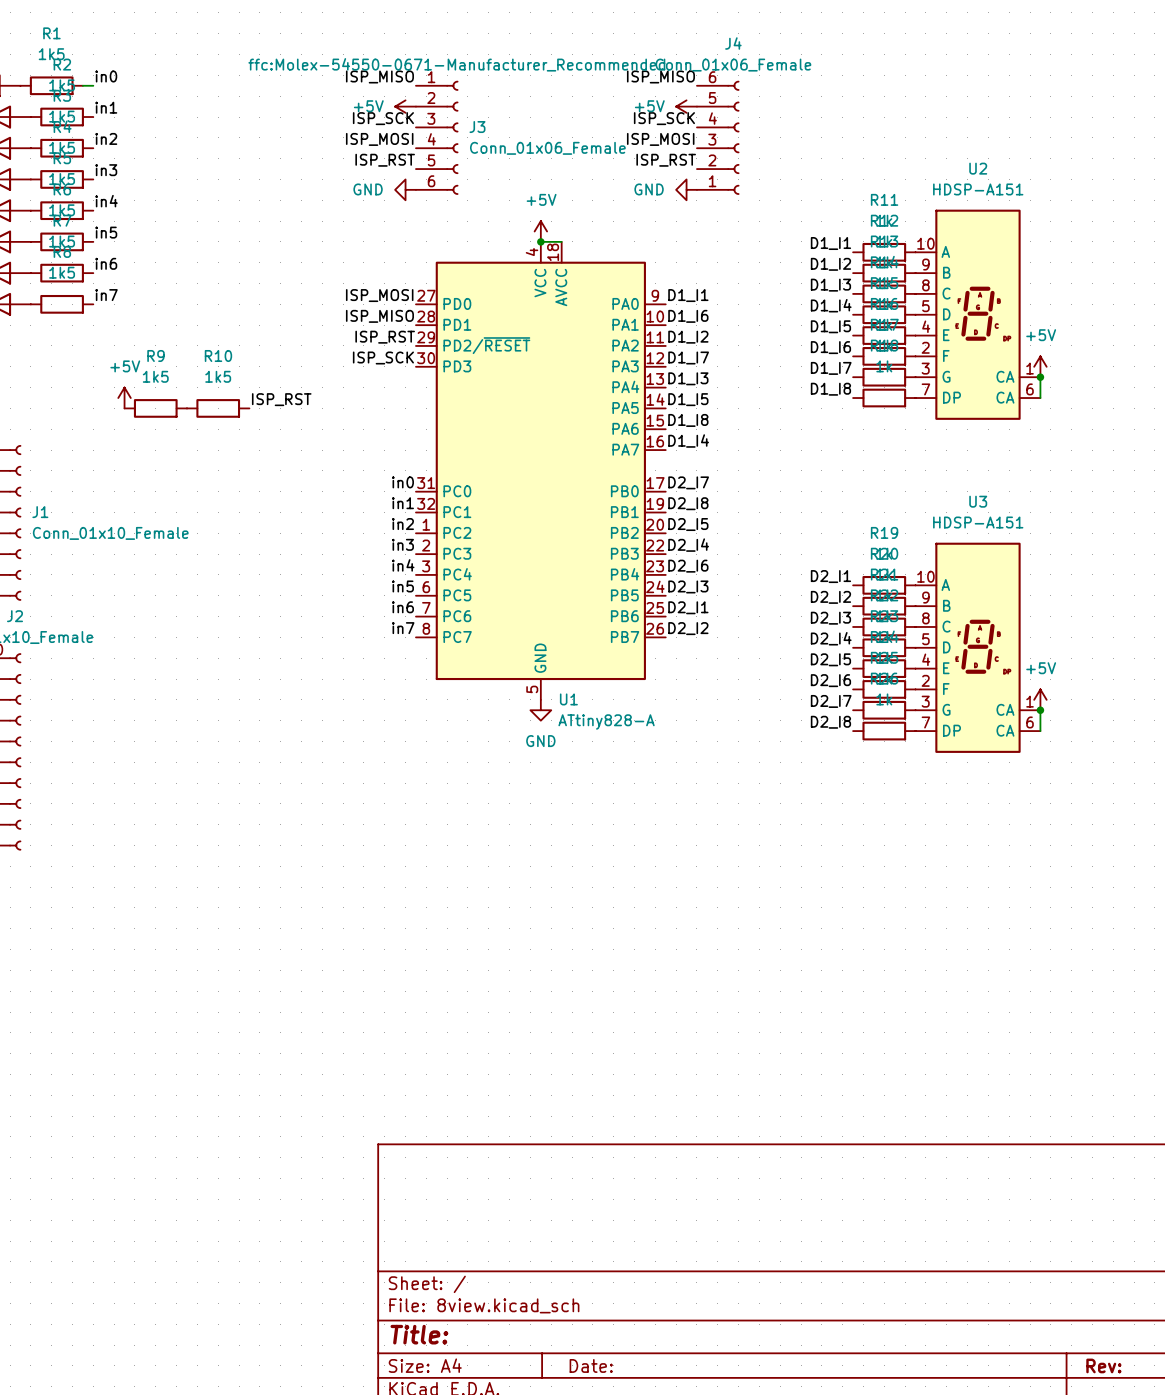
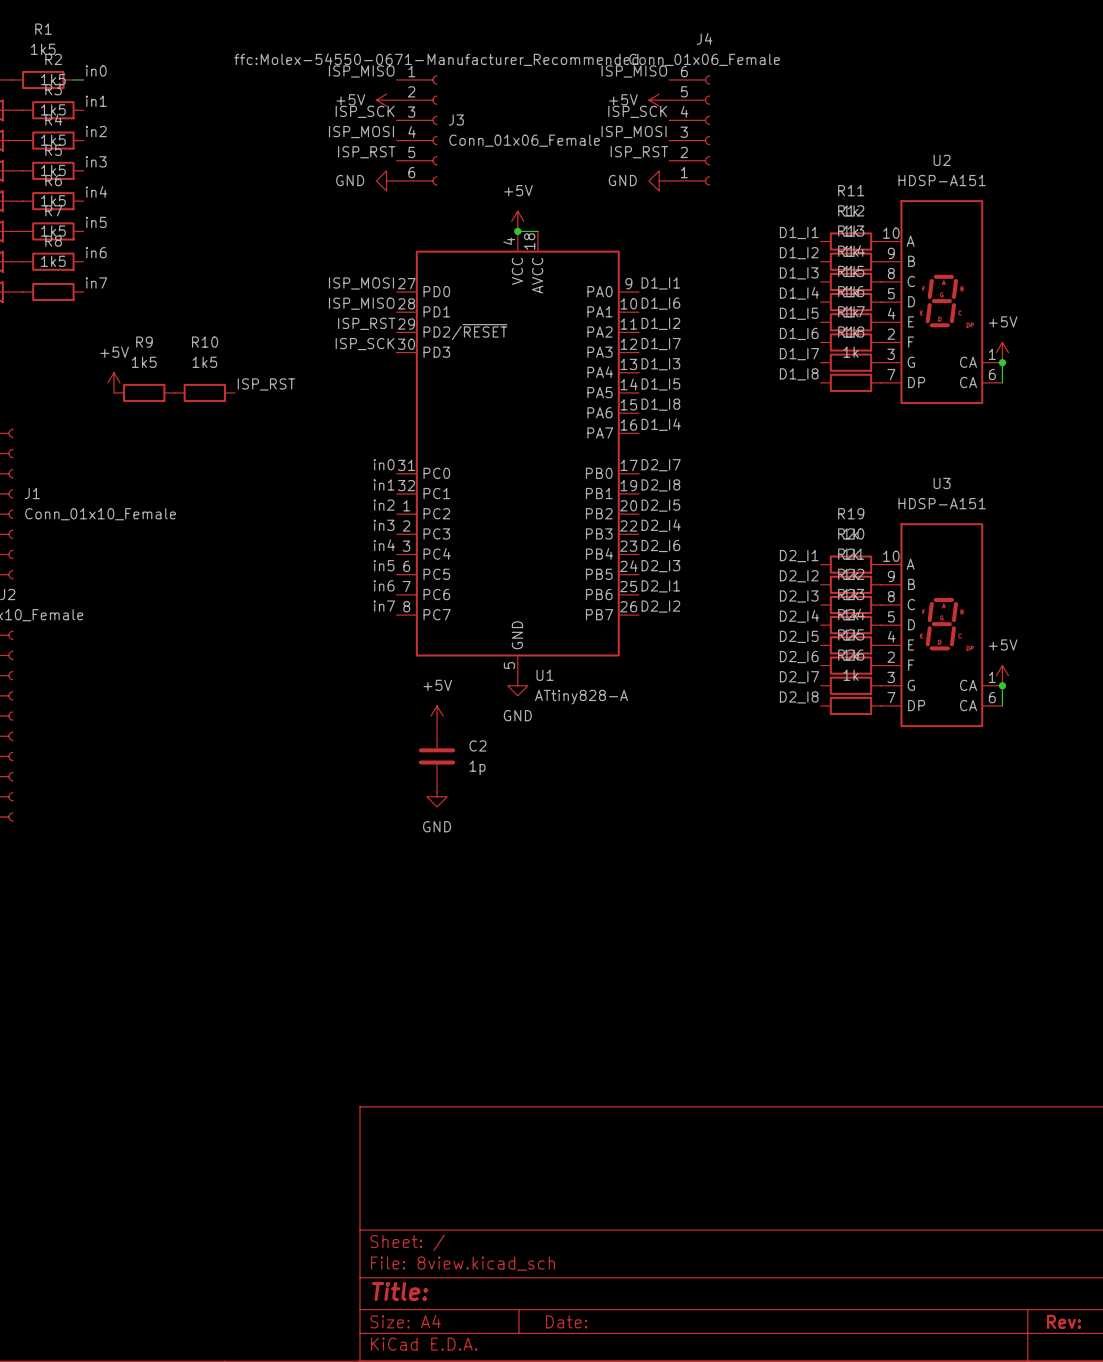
power symbol: none -> +5V (437, 716)
C2: none -> 1p (437, 756)
power symbol: none -> GND (437, 796)

